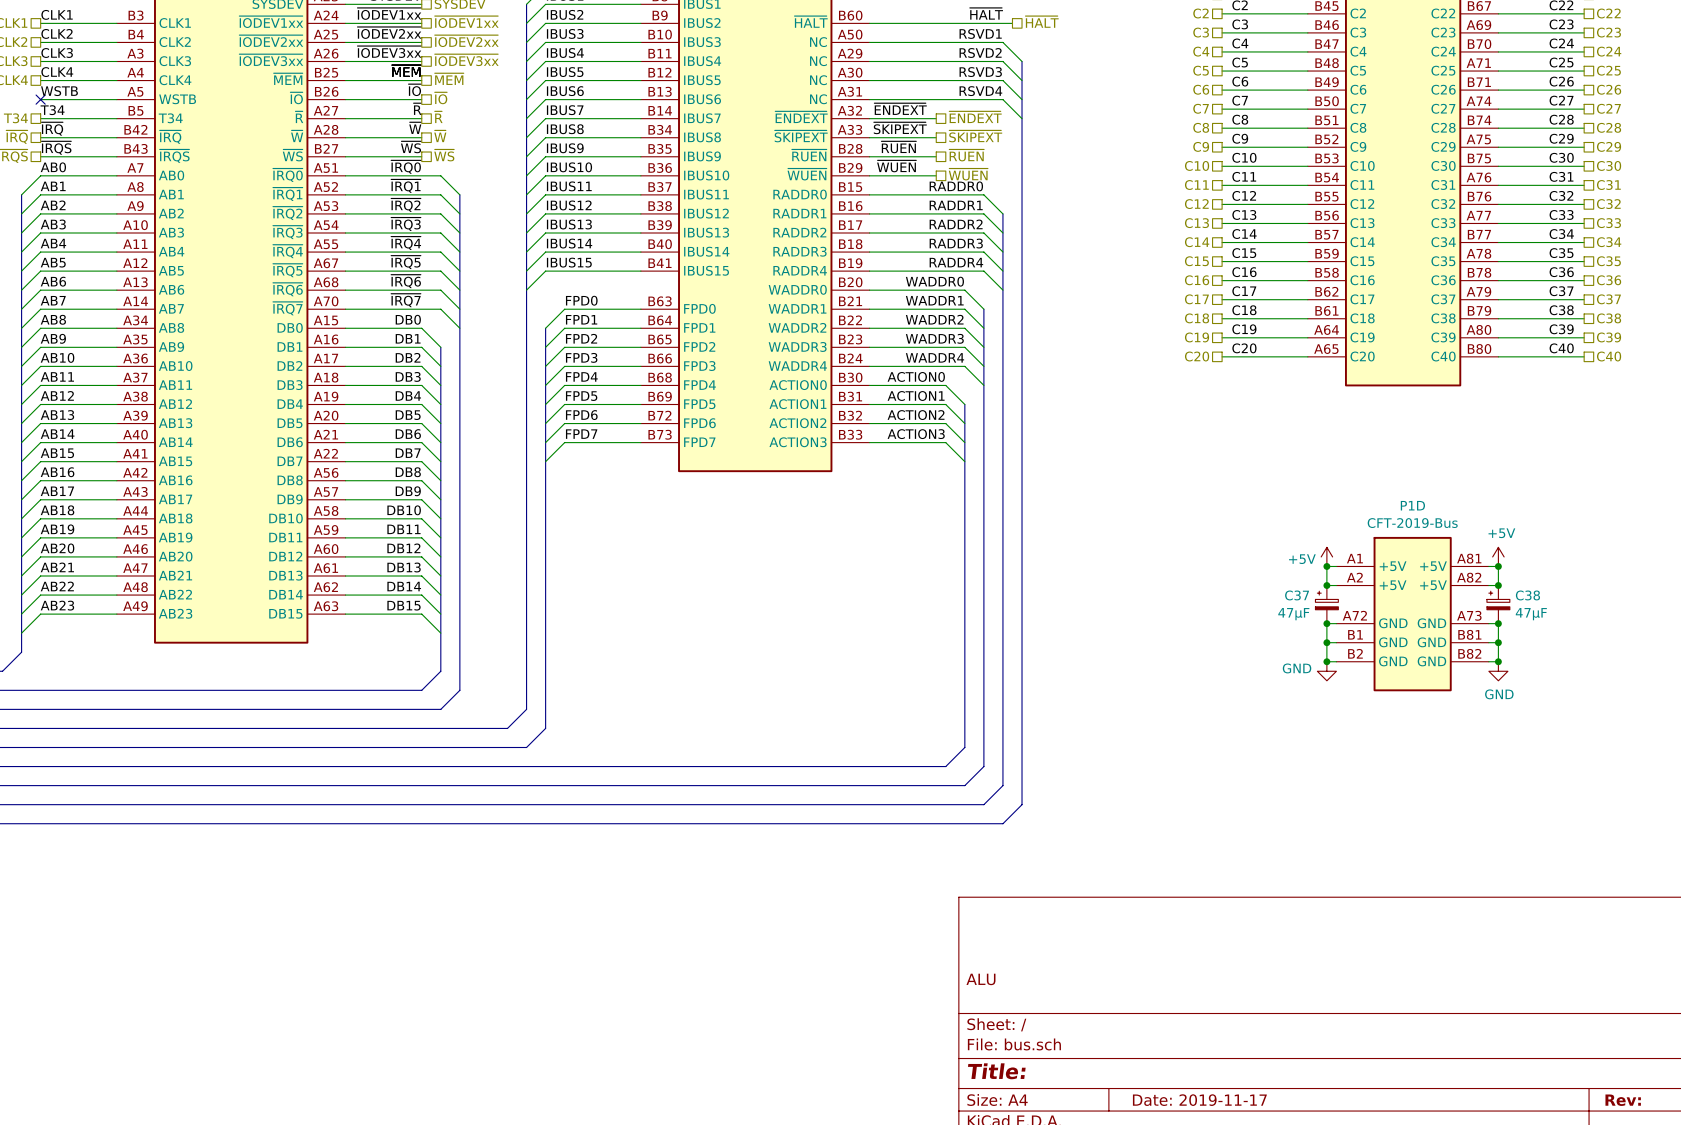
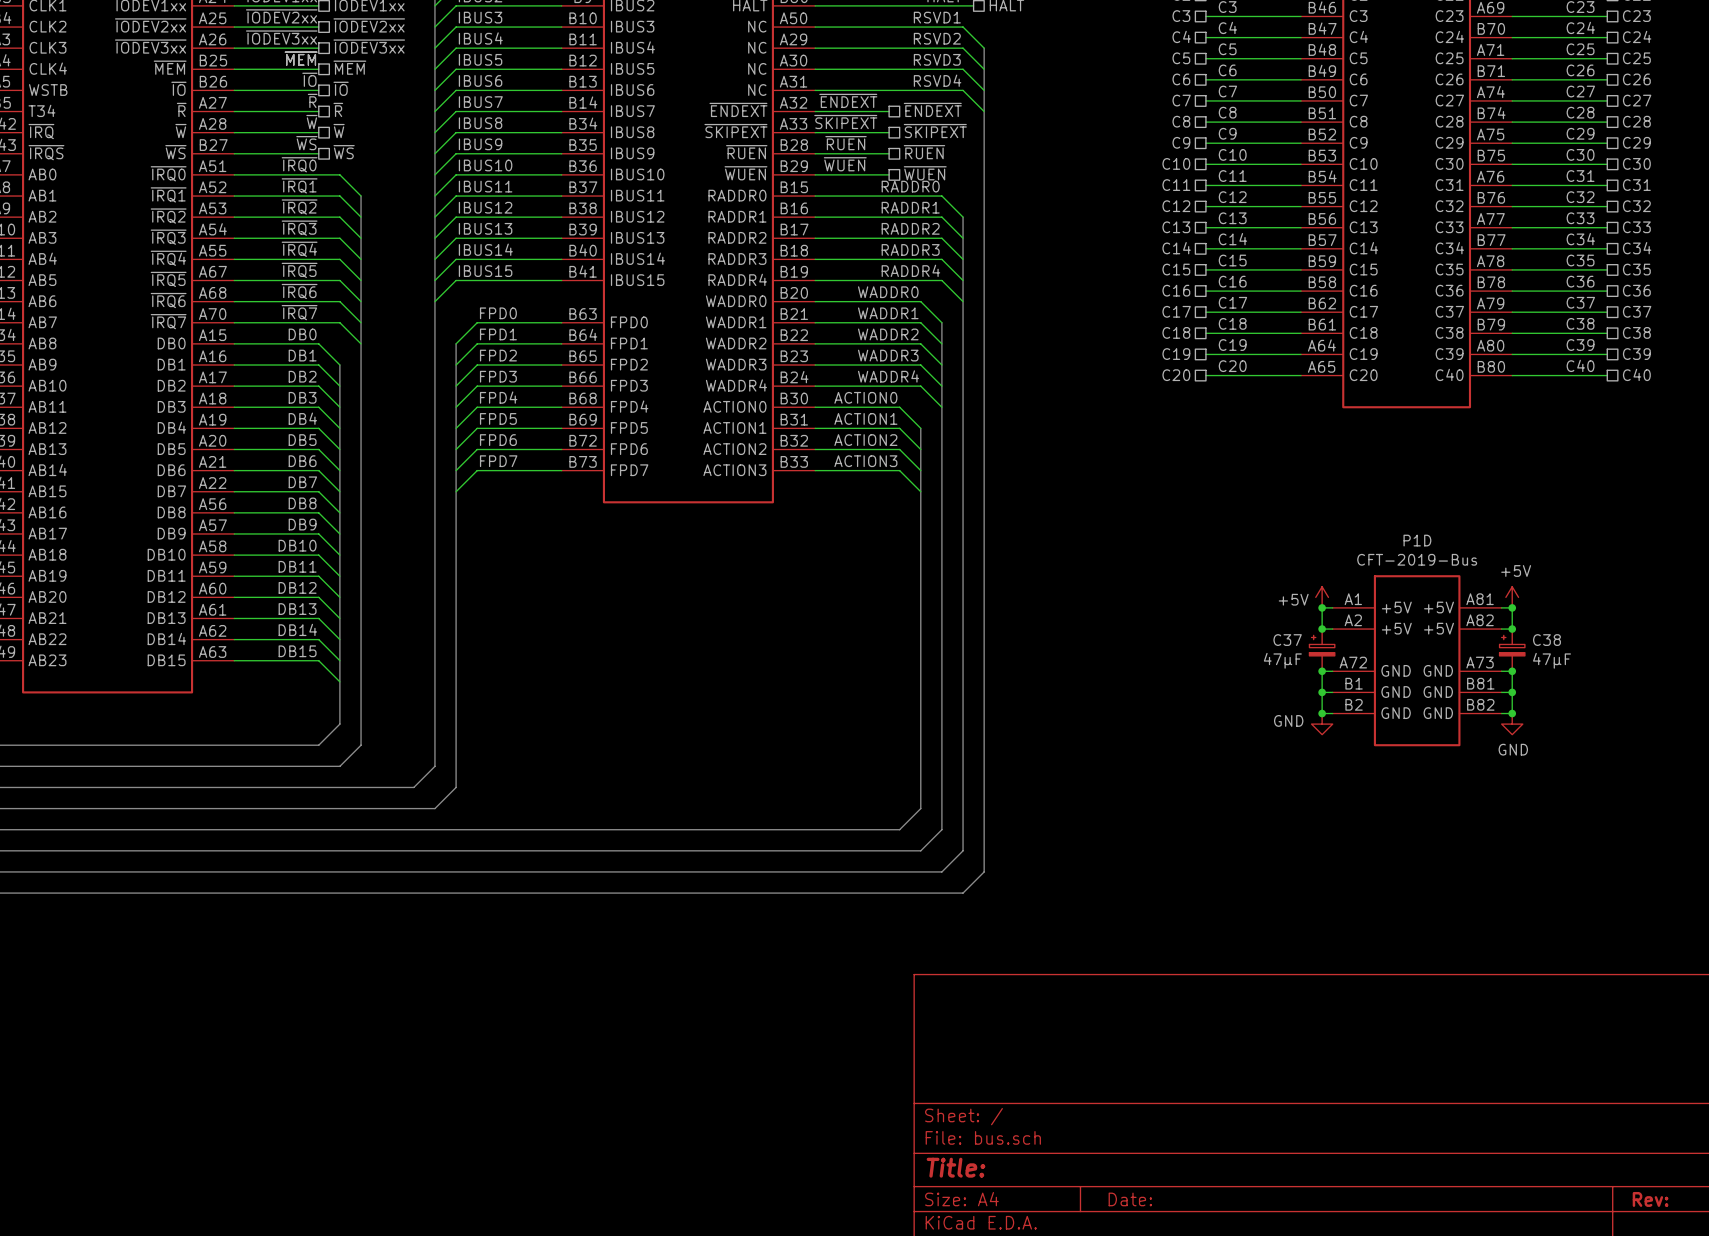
title block: ALU (980, 979) -> none
title block: Date: 2019-11-17 (1199, 1100) -> Date: (1130, 1199)

